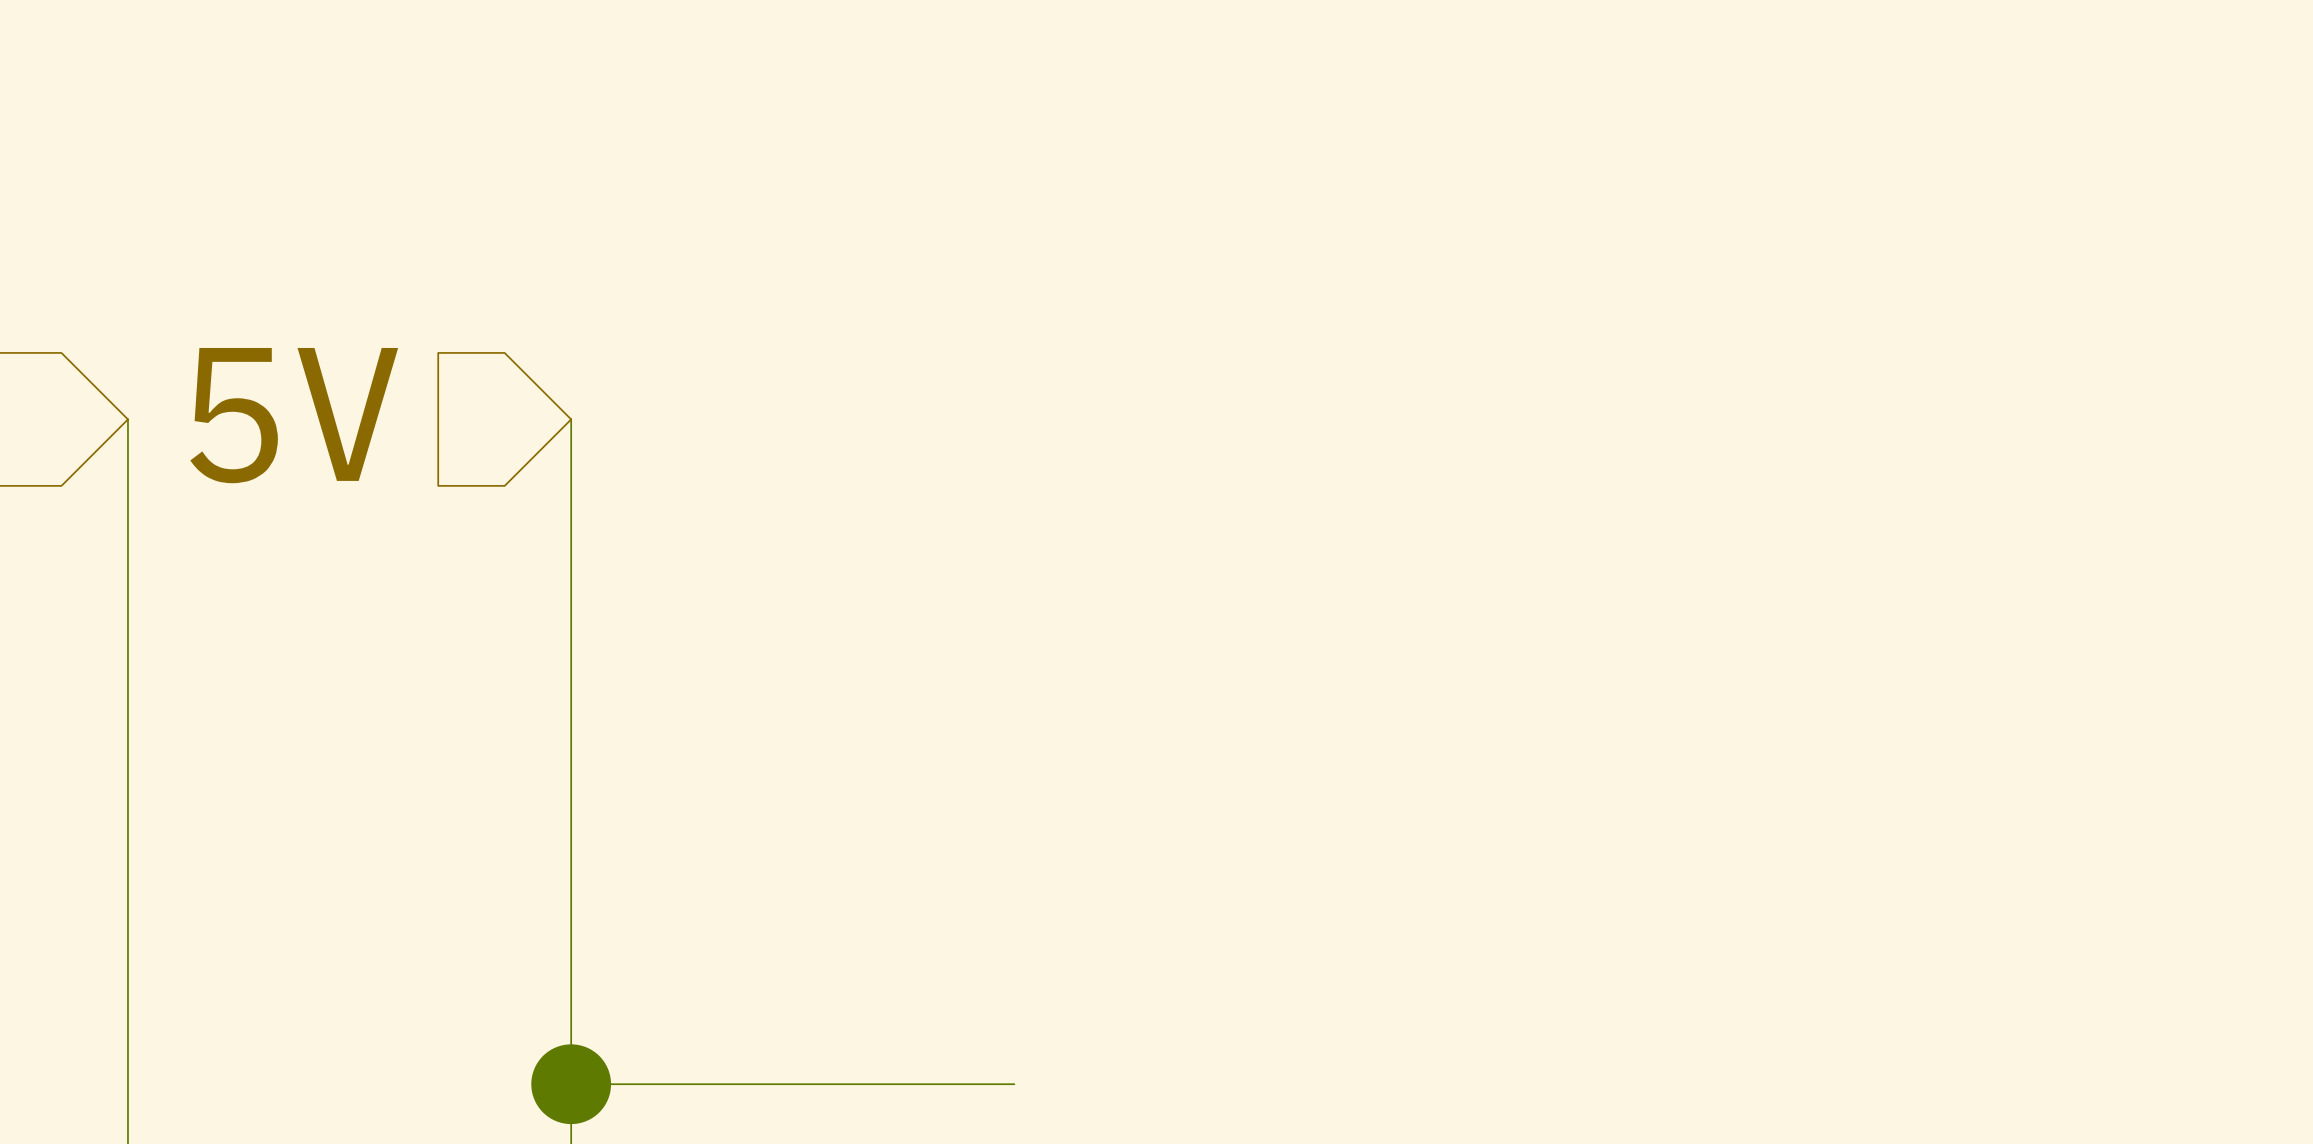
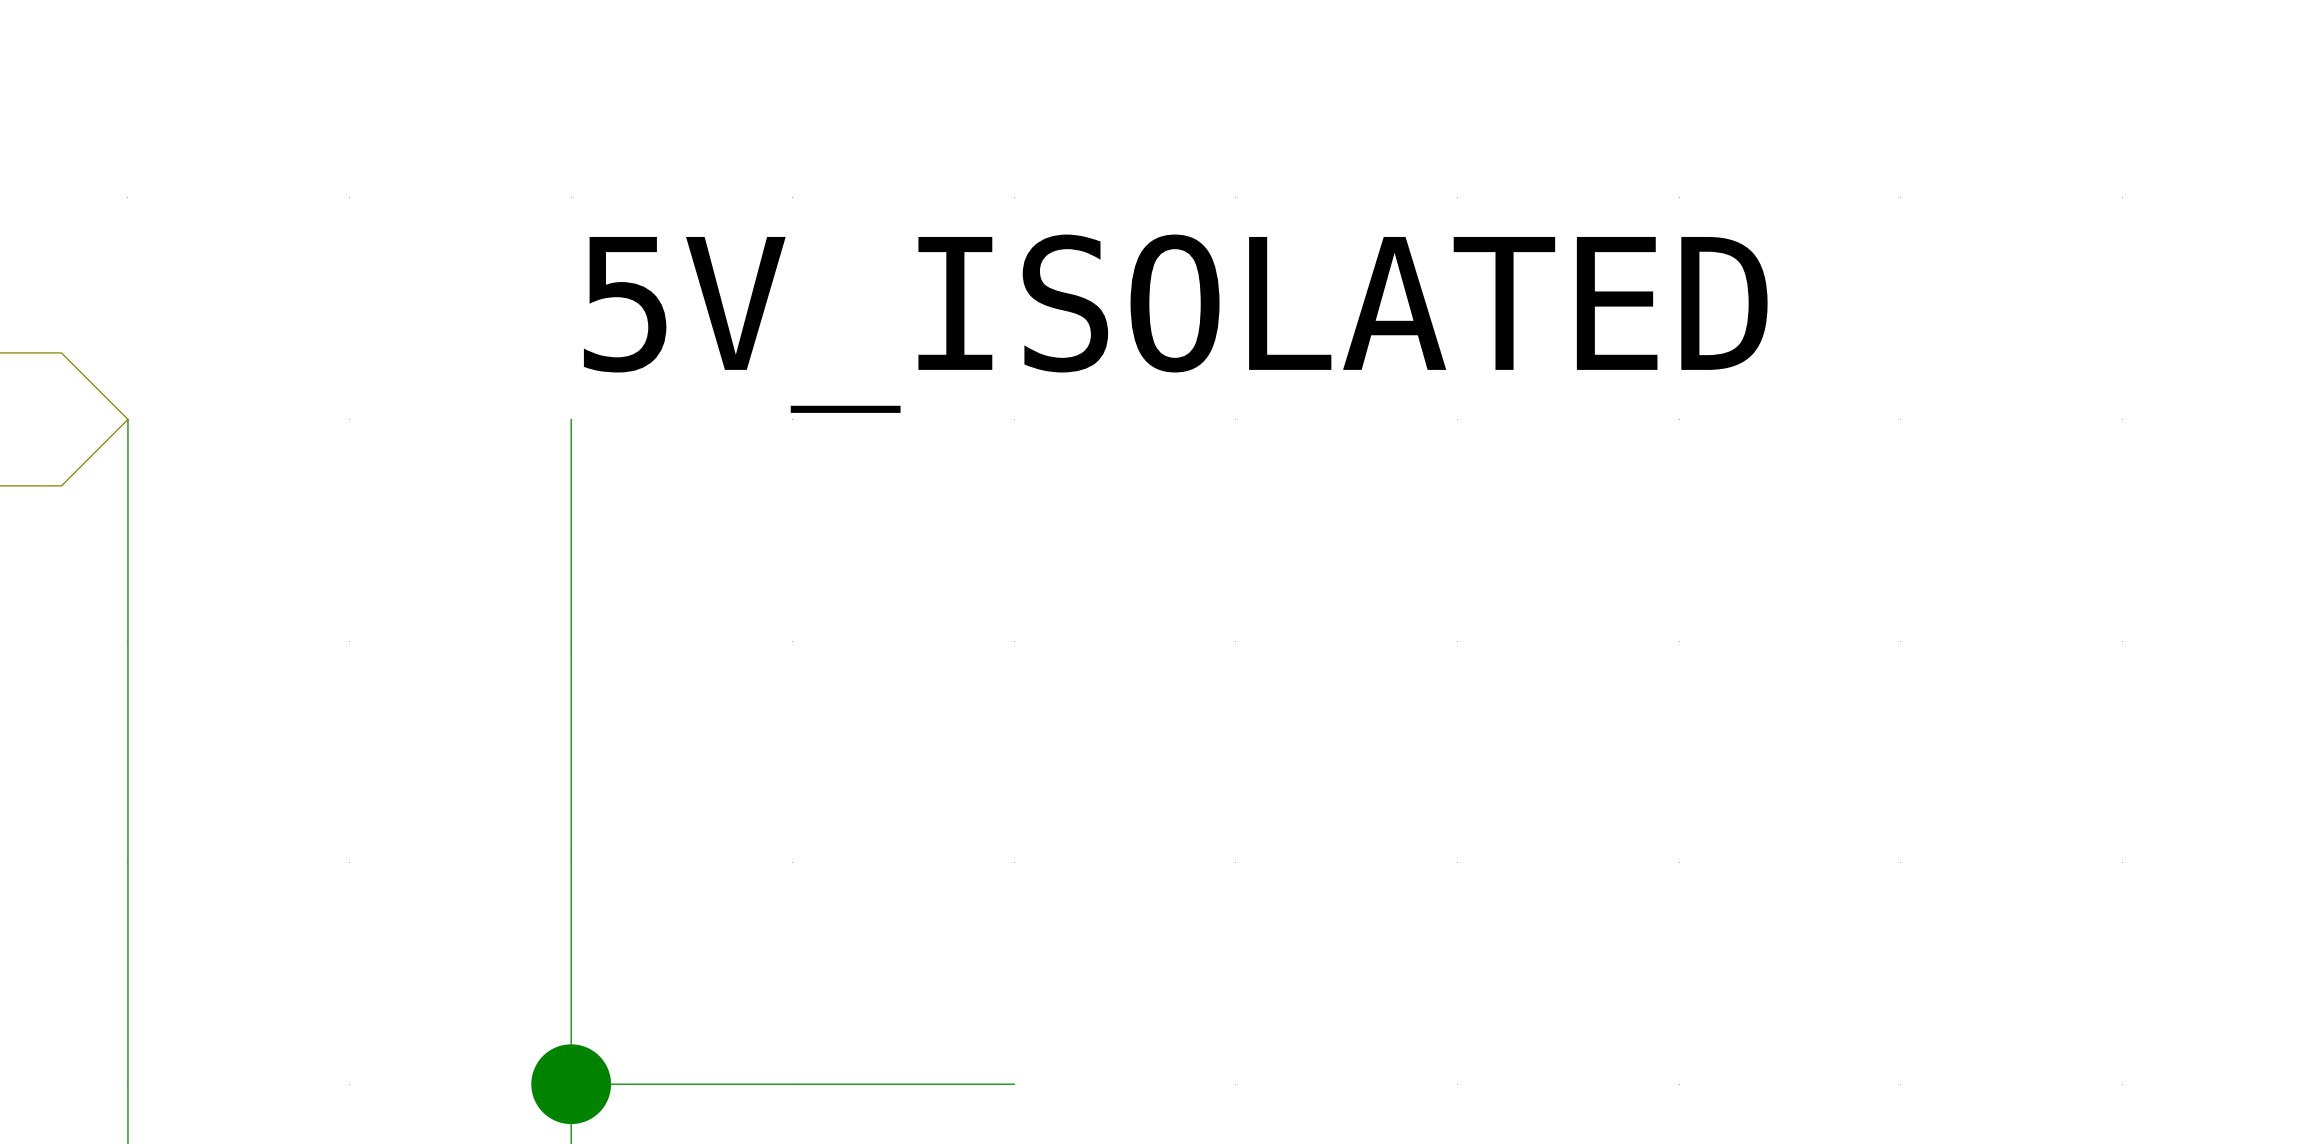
label: none -> 5V_ISOLATED (1175, 323)
hierarchical label: 5V (294, 415) -> none

